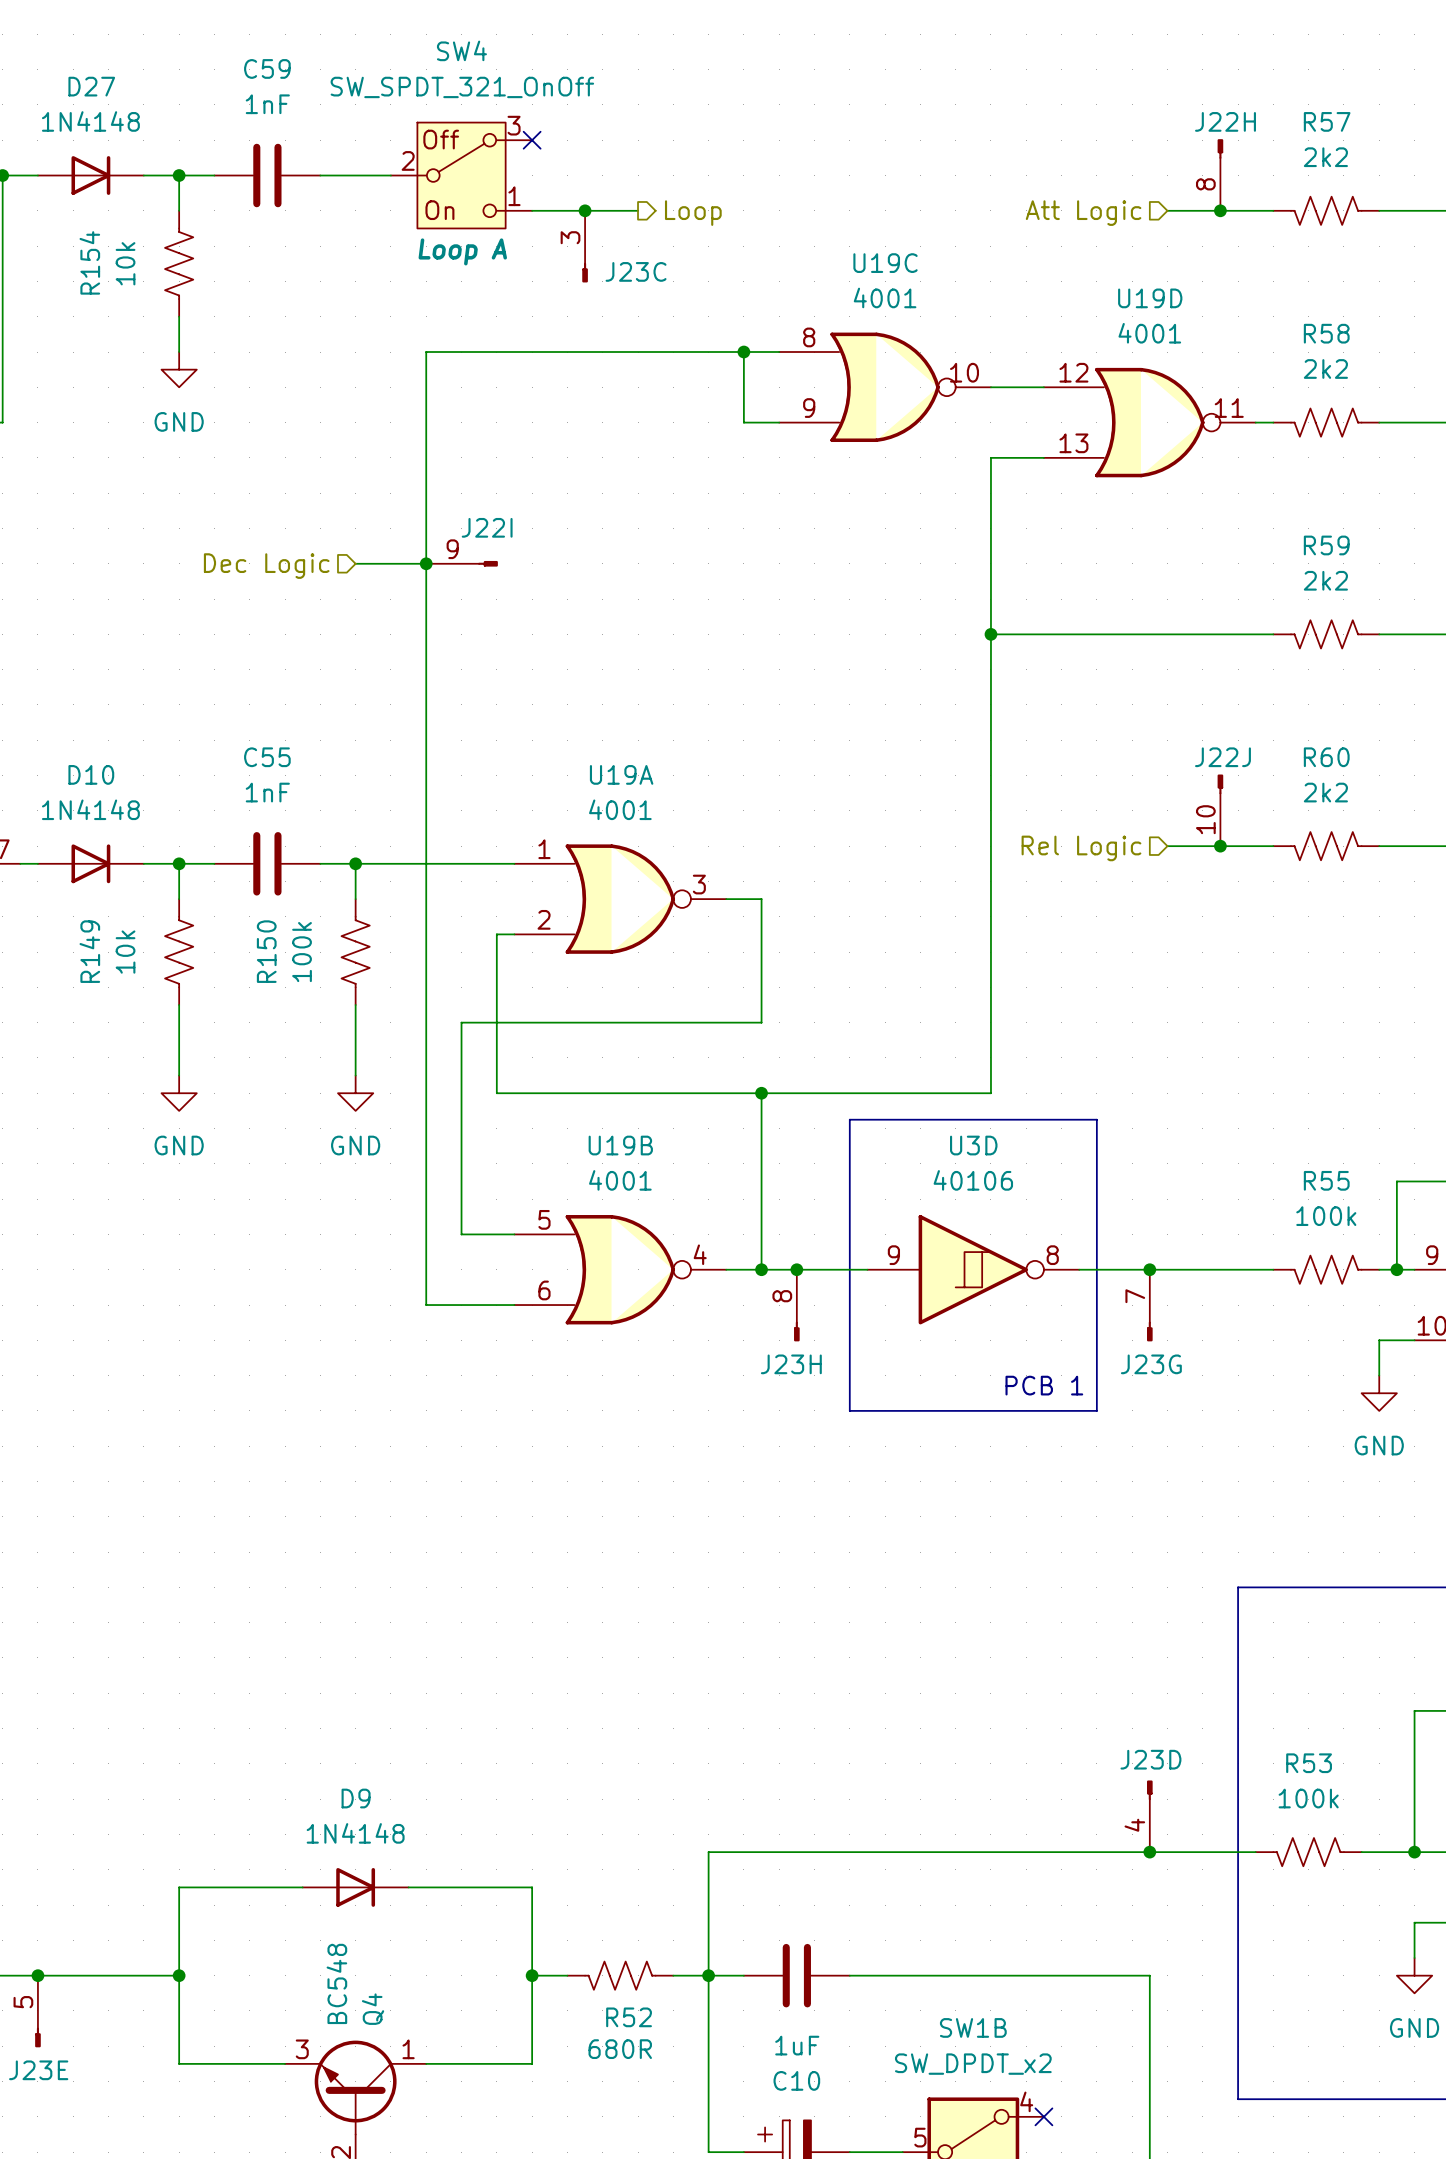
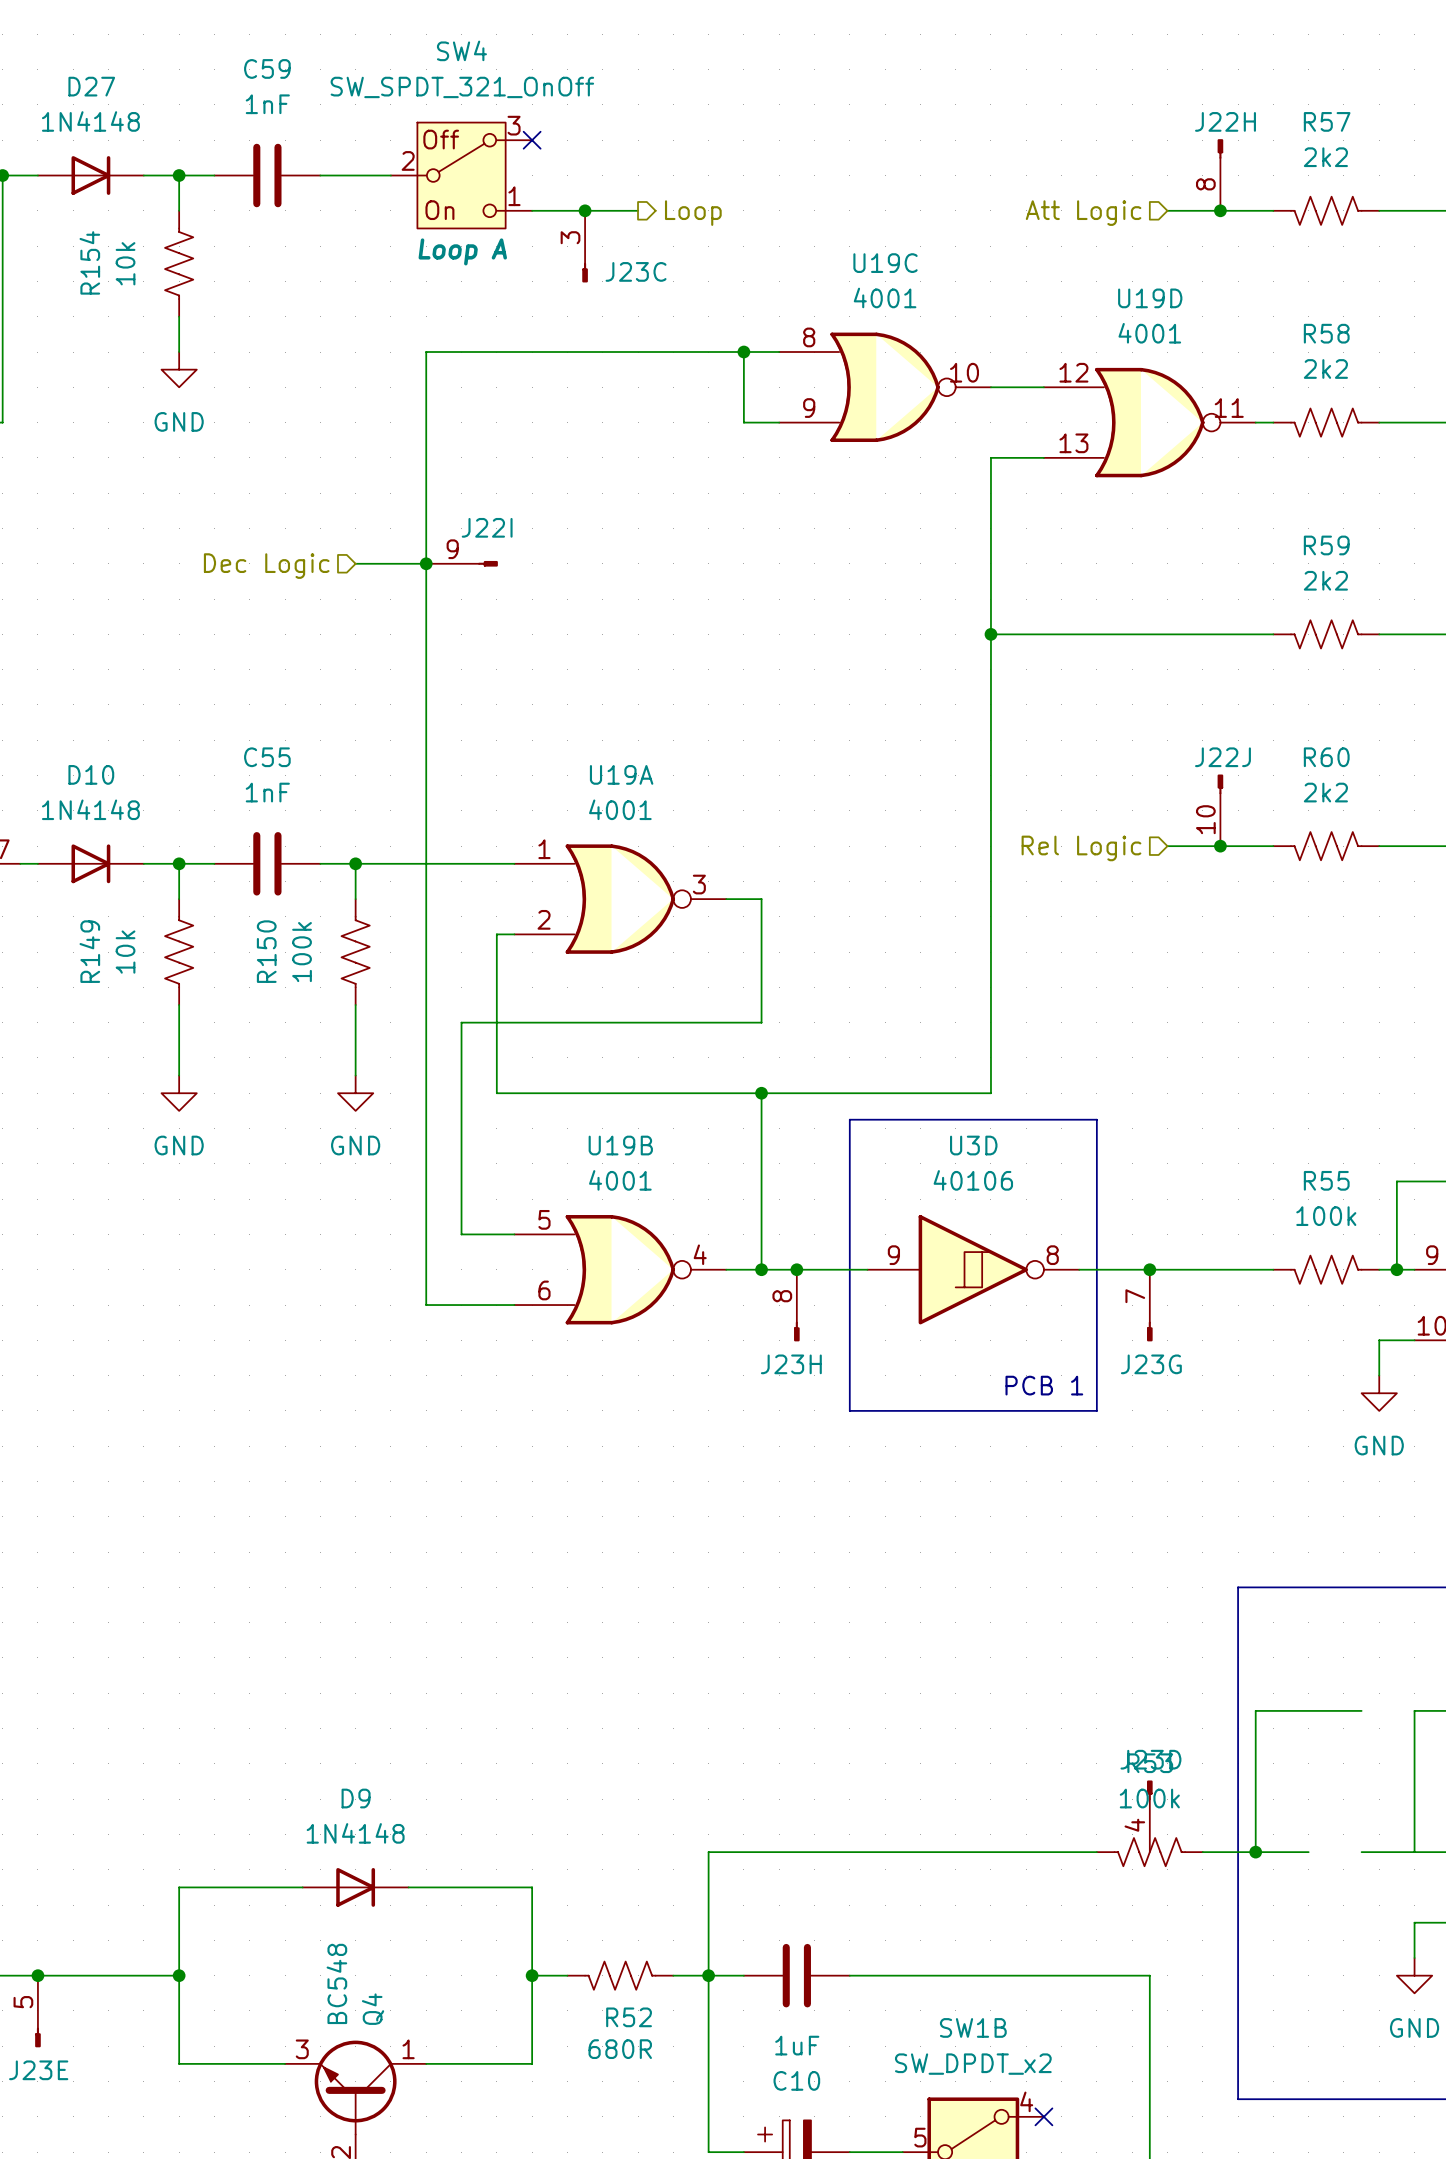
wire: none -> (1361, 1710) (1255, 1710) (1255, 1852) (1308, 1852)
junction: (1149, 1852) -> none
junction: none -> (1255, 1852)
R53 position: (1308, 1852) -> (1149, 1852)
junction: (1414, 1852) -> none

